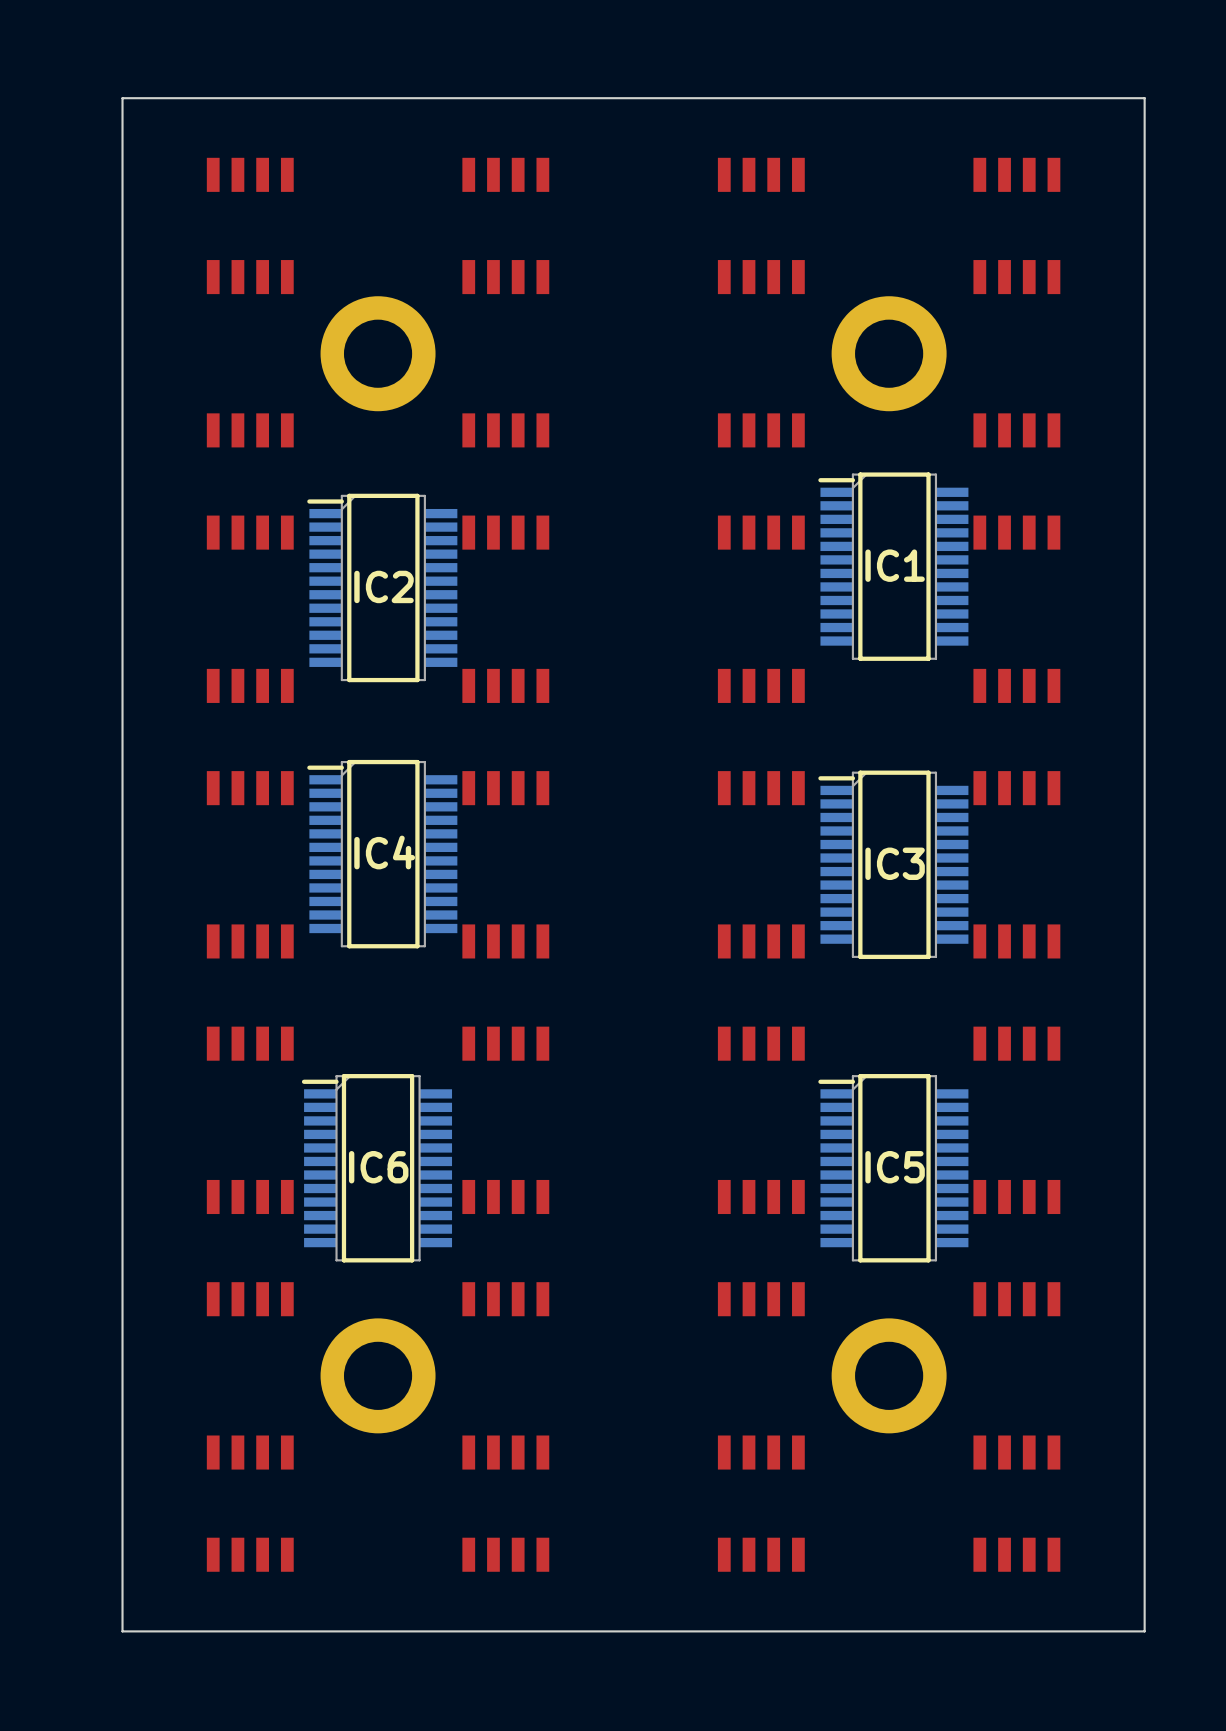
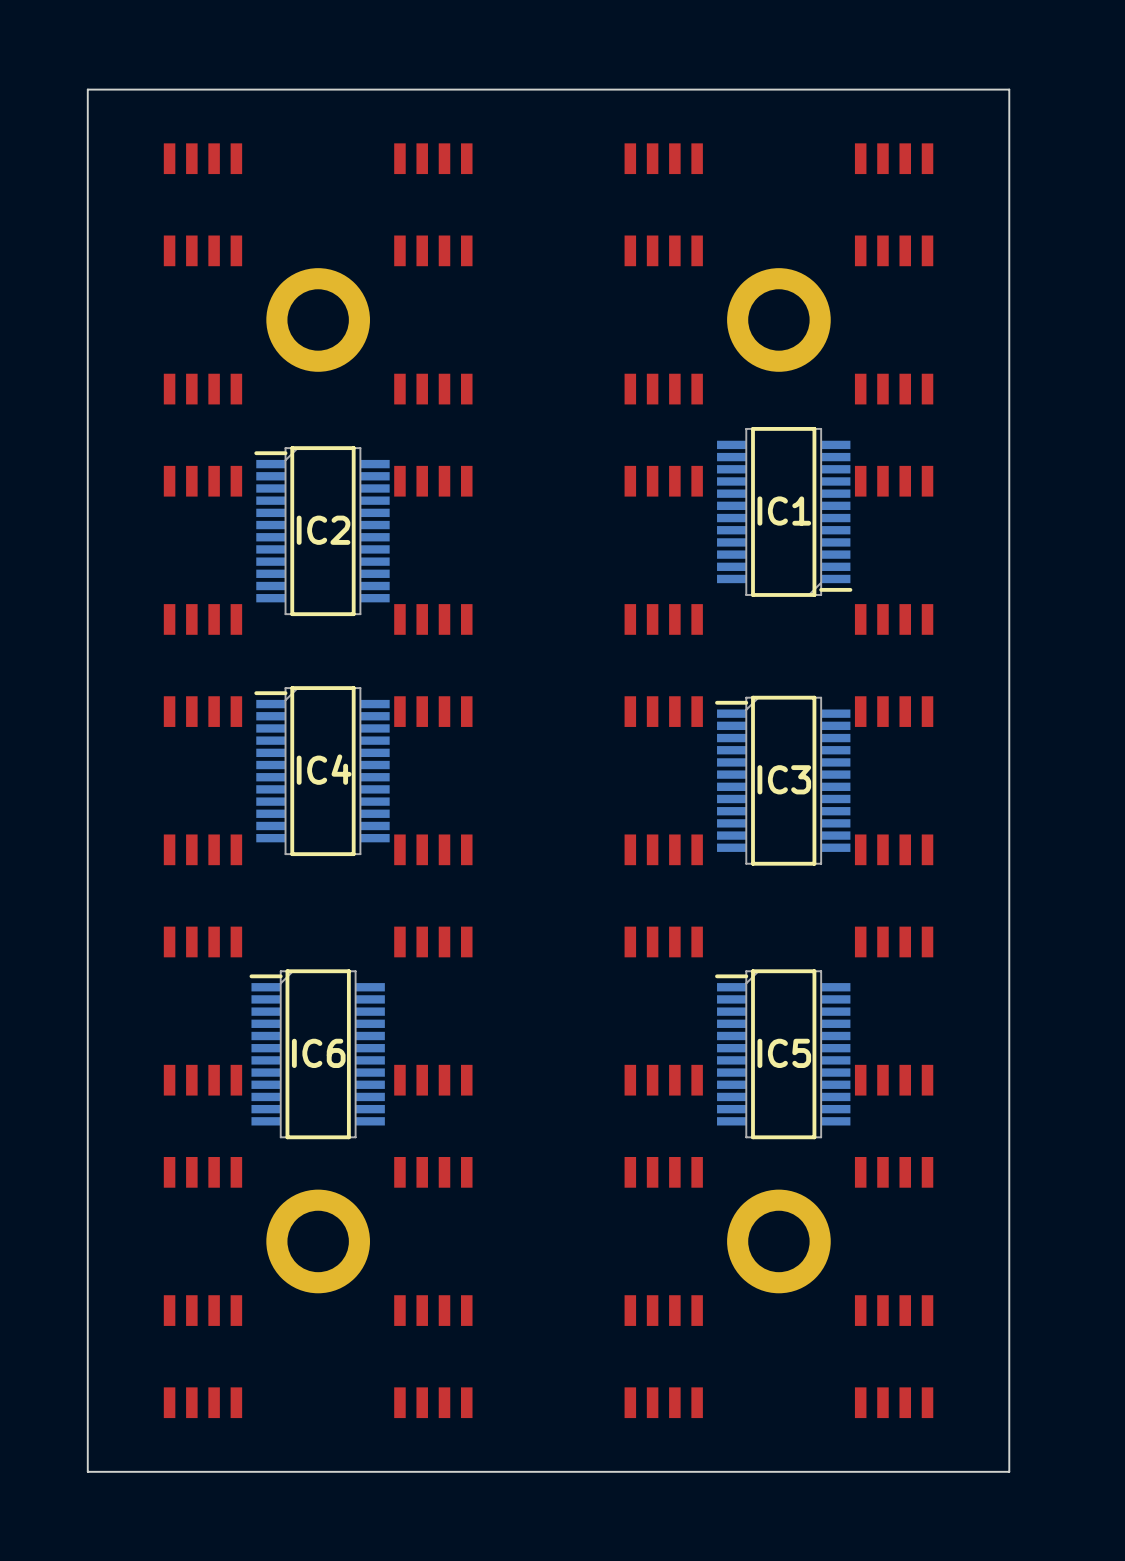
IC1 rotation: 0° (893, 566) -> 180° (784, 511)

